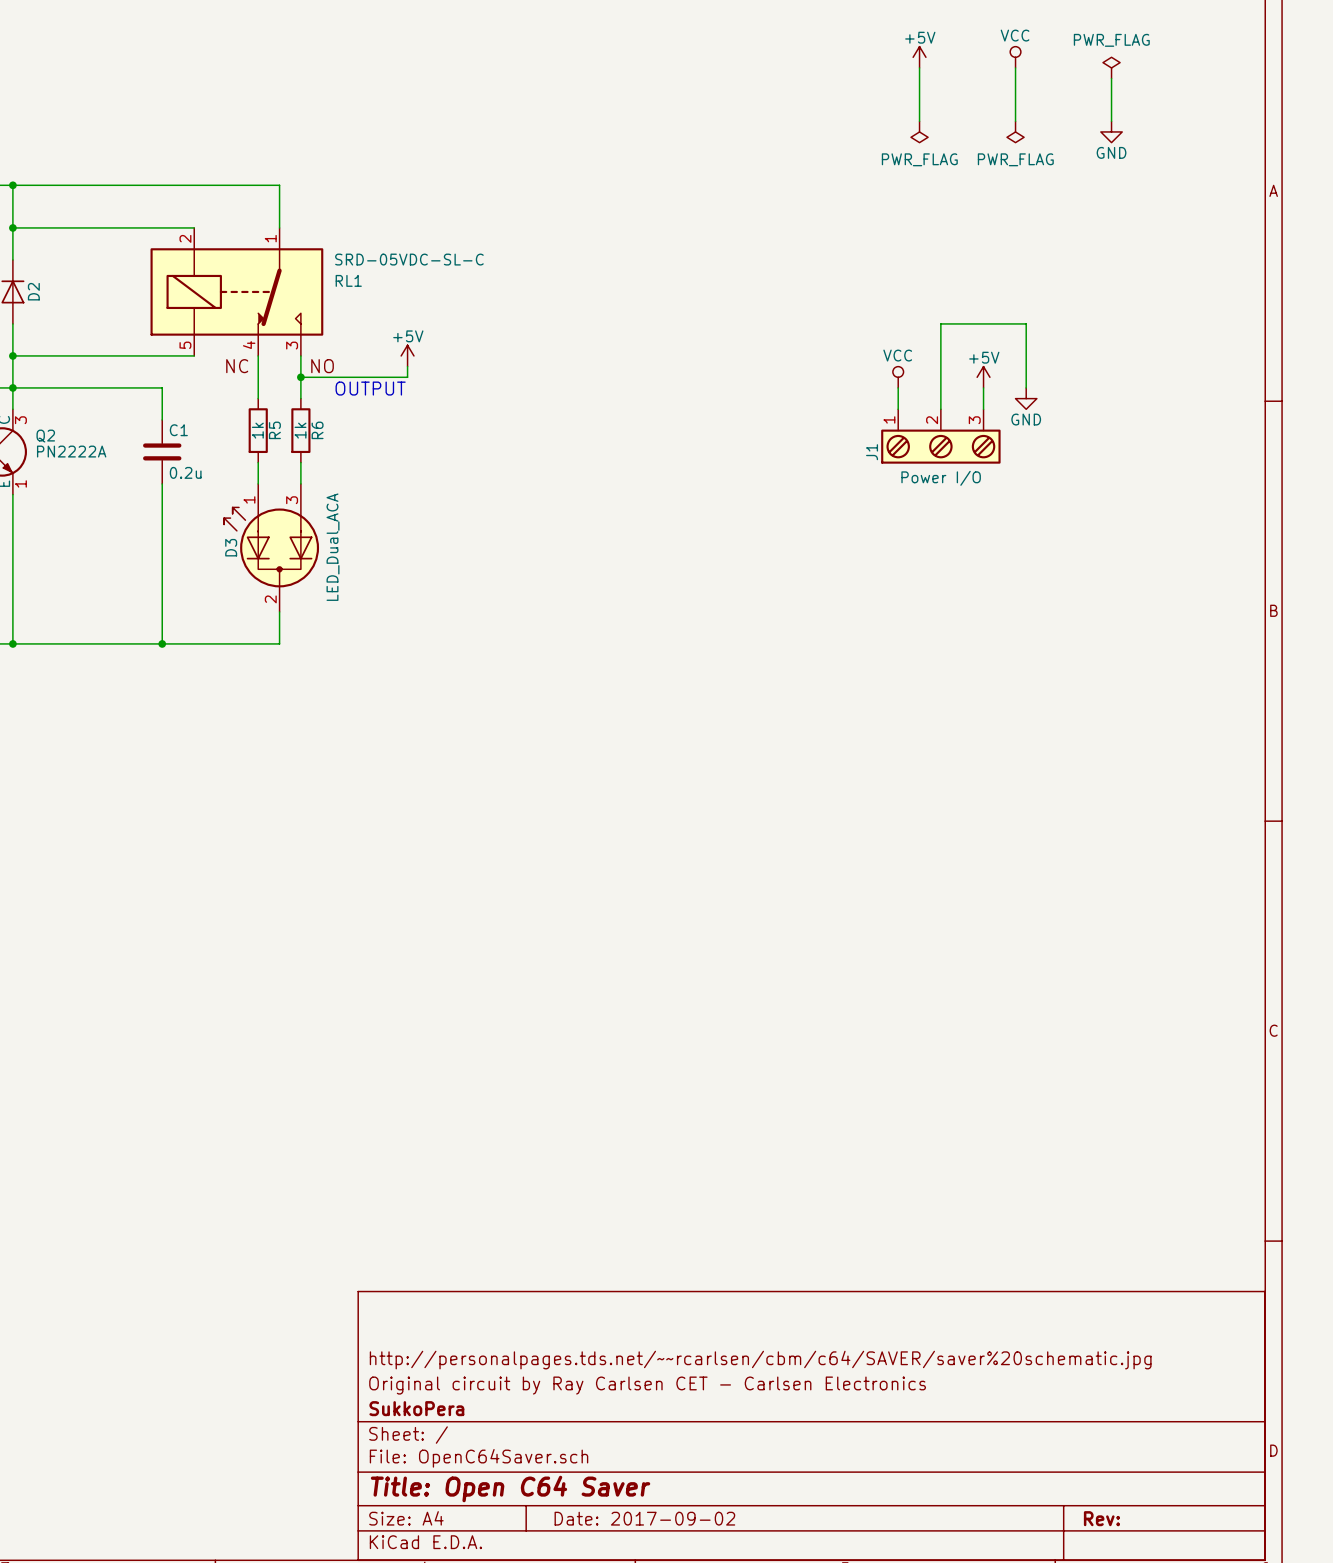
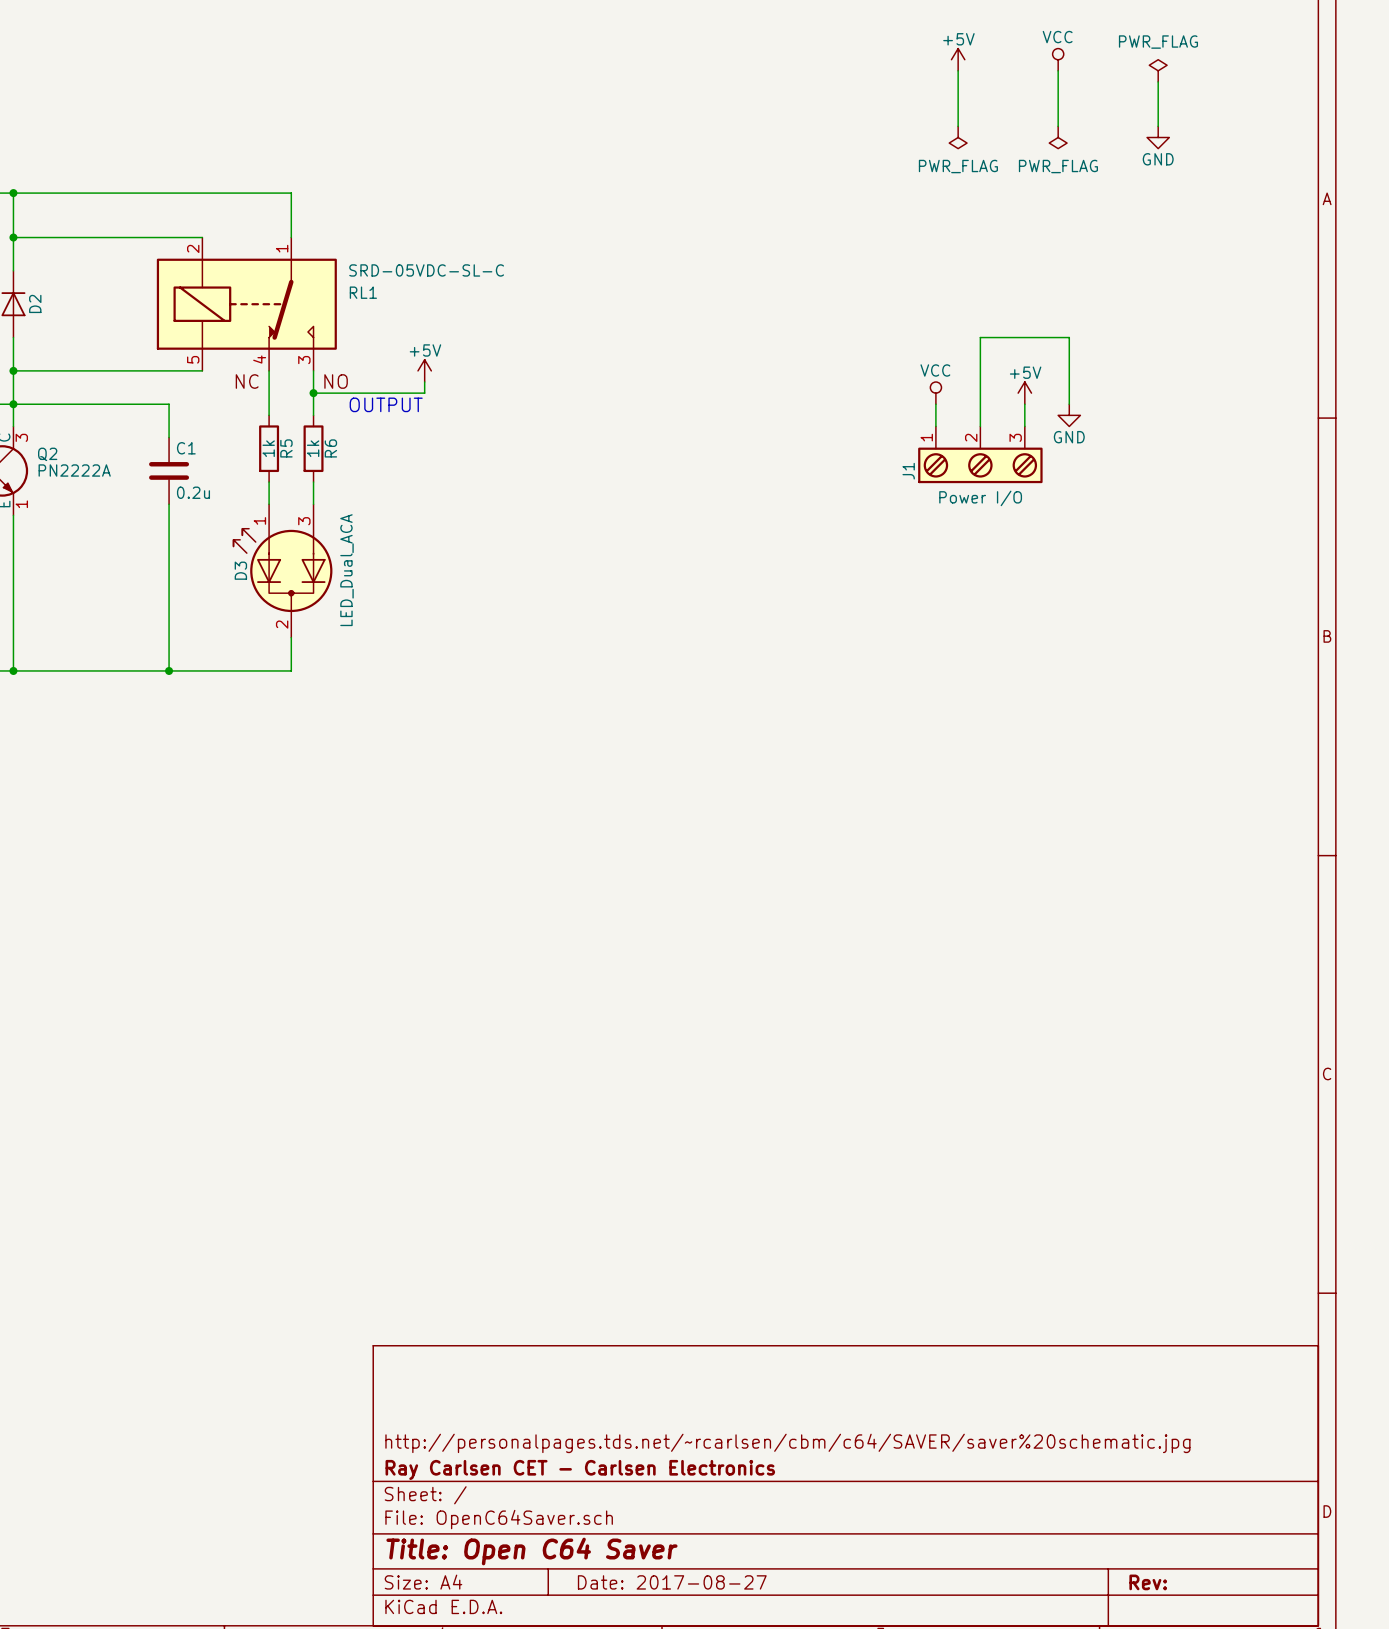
title block: http://personalpages.tds.net/~~rcarlsen/cbm/c64/SAVER/saver%20schematic.jpg (760, 1360) -> none
title block: Original circuit by Ray Carlsen CET - Carlsen Electronics (647, 1385) -> http://personalpages.tds.net/~rcarlsen/cbm/c64/SAVER/saver%20schematic.jpg (787, 1443)
title block: SukkoPera (416, 1408) -> Ray Carlsen CET - Carlsen Electronics (580, 1469)
title block: Date: 2017-09-02 (644, 1518) -> Date: 2017-08-27 (672, 1582)

